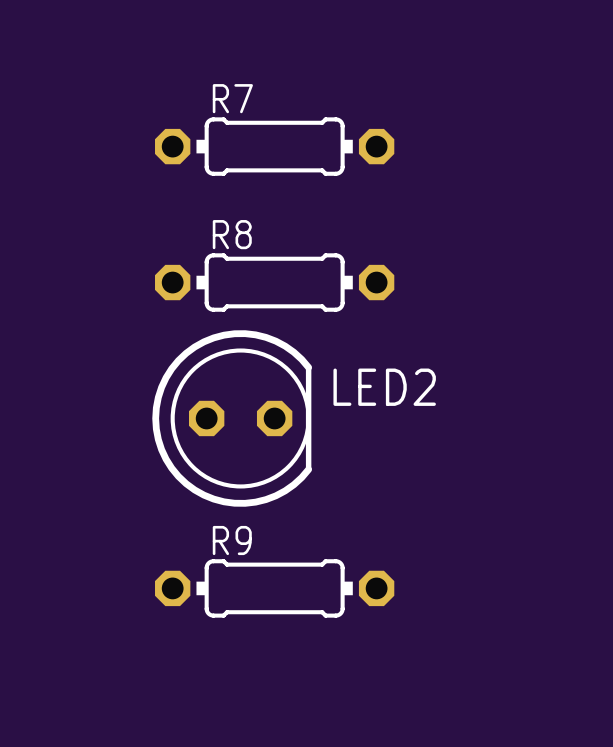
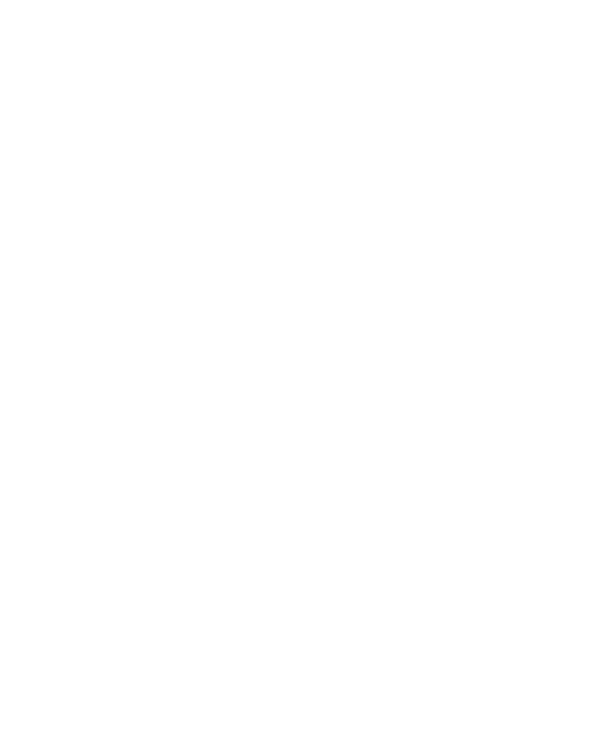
R7: (274, 146) -> none
R8: (274, 282) -> none
LED2: (232, 418) -> none
R9: (274, 588) -> none

